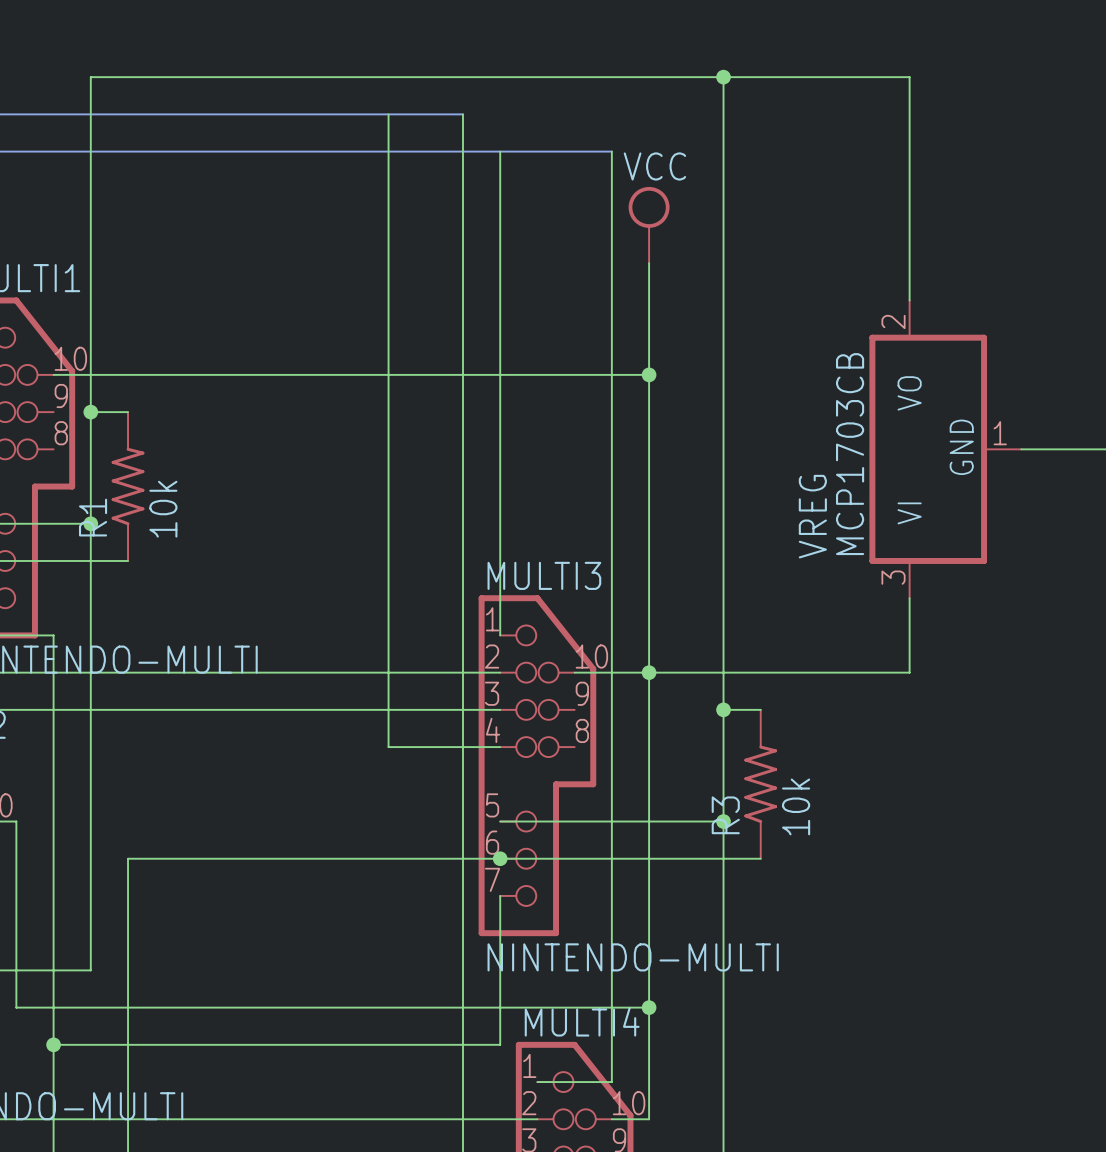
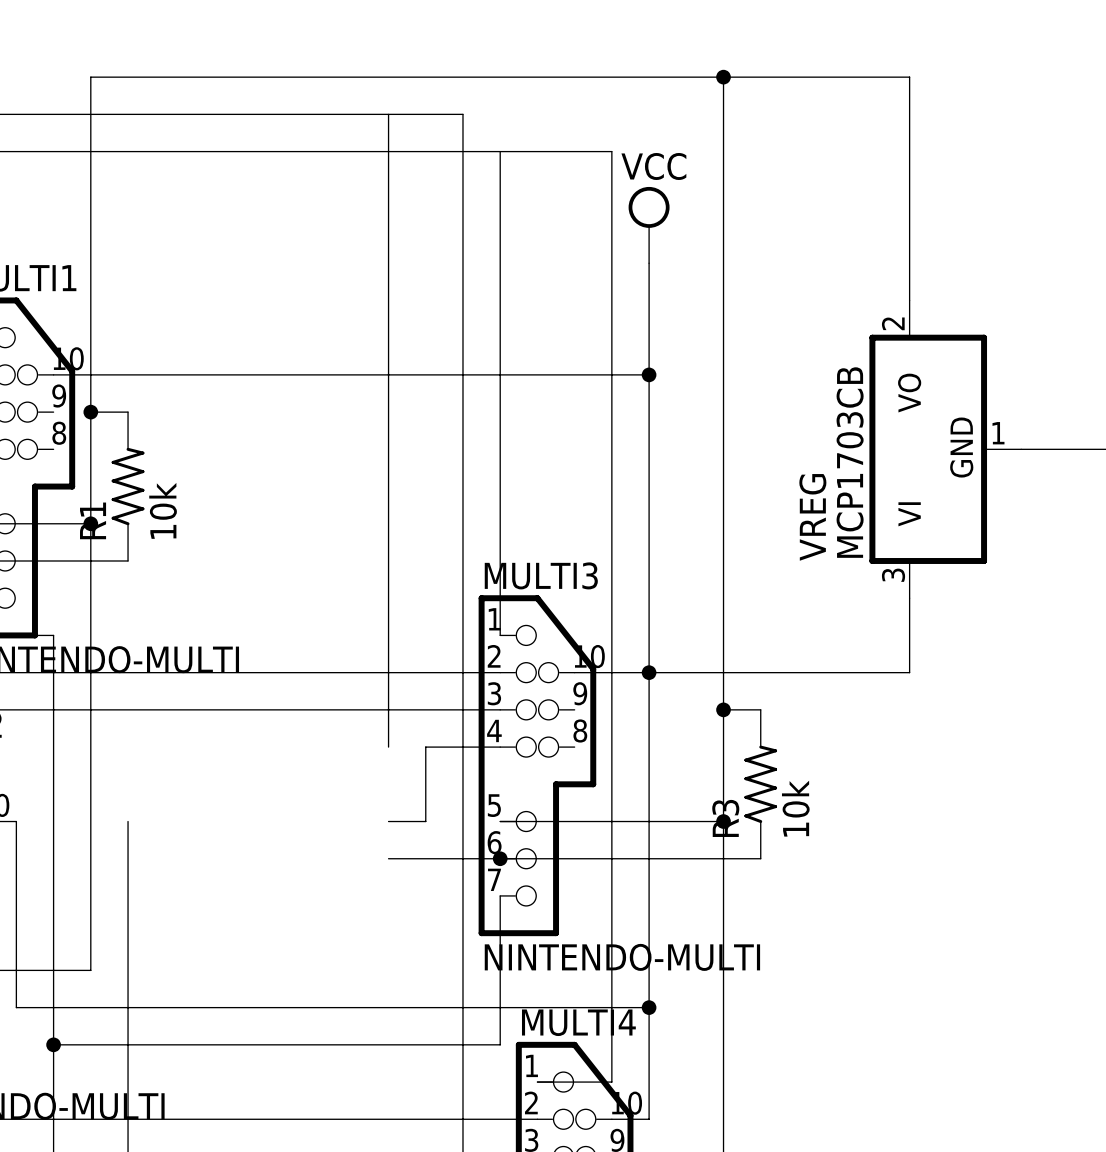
wire: (388, 747) (425, 747) -> (388, 821) (425, 821) (425, 747)
wire: (128, 858) (388, 858) -> (128, 858) (128, 821)

